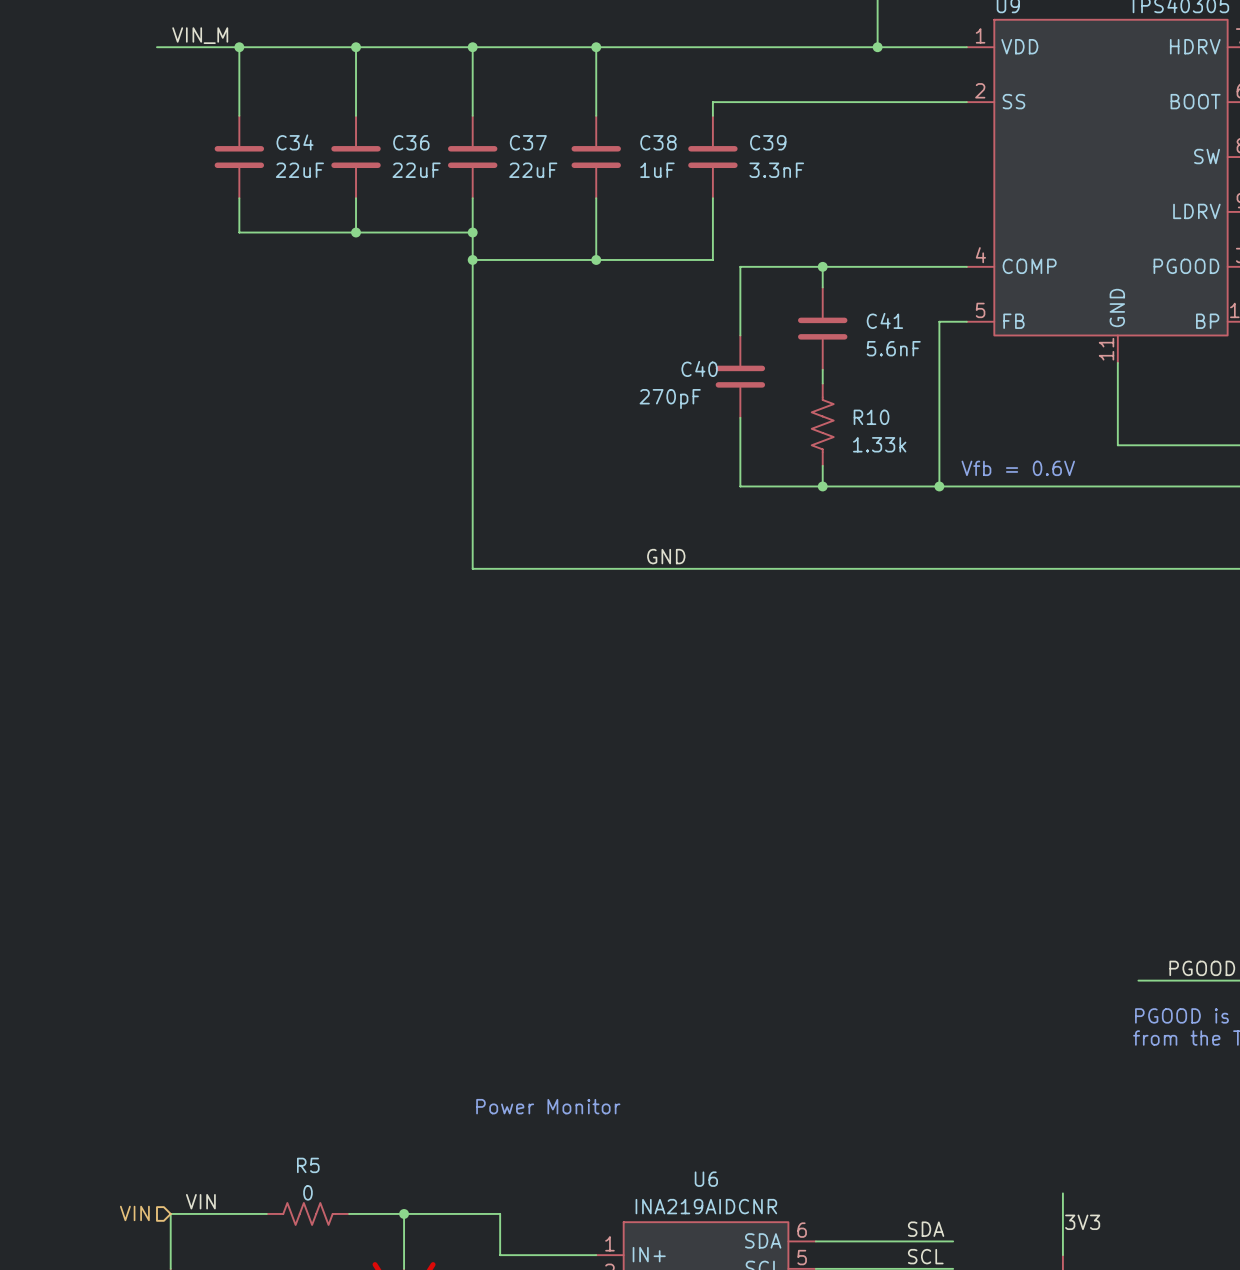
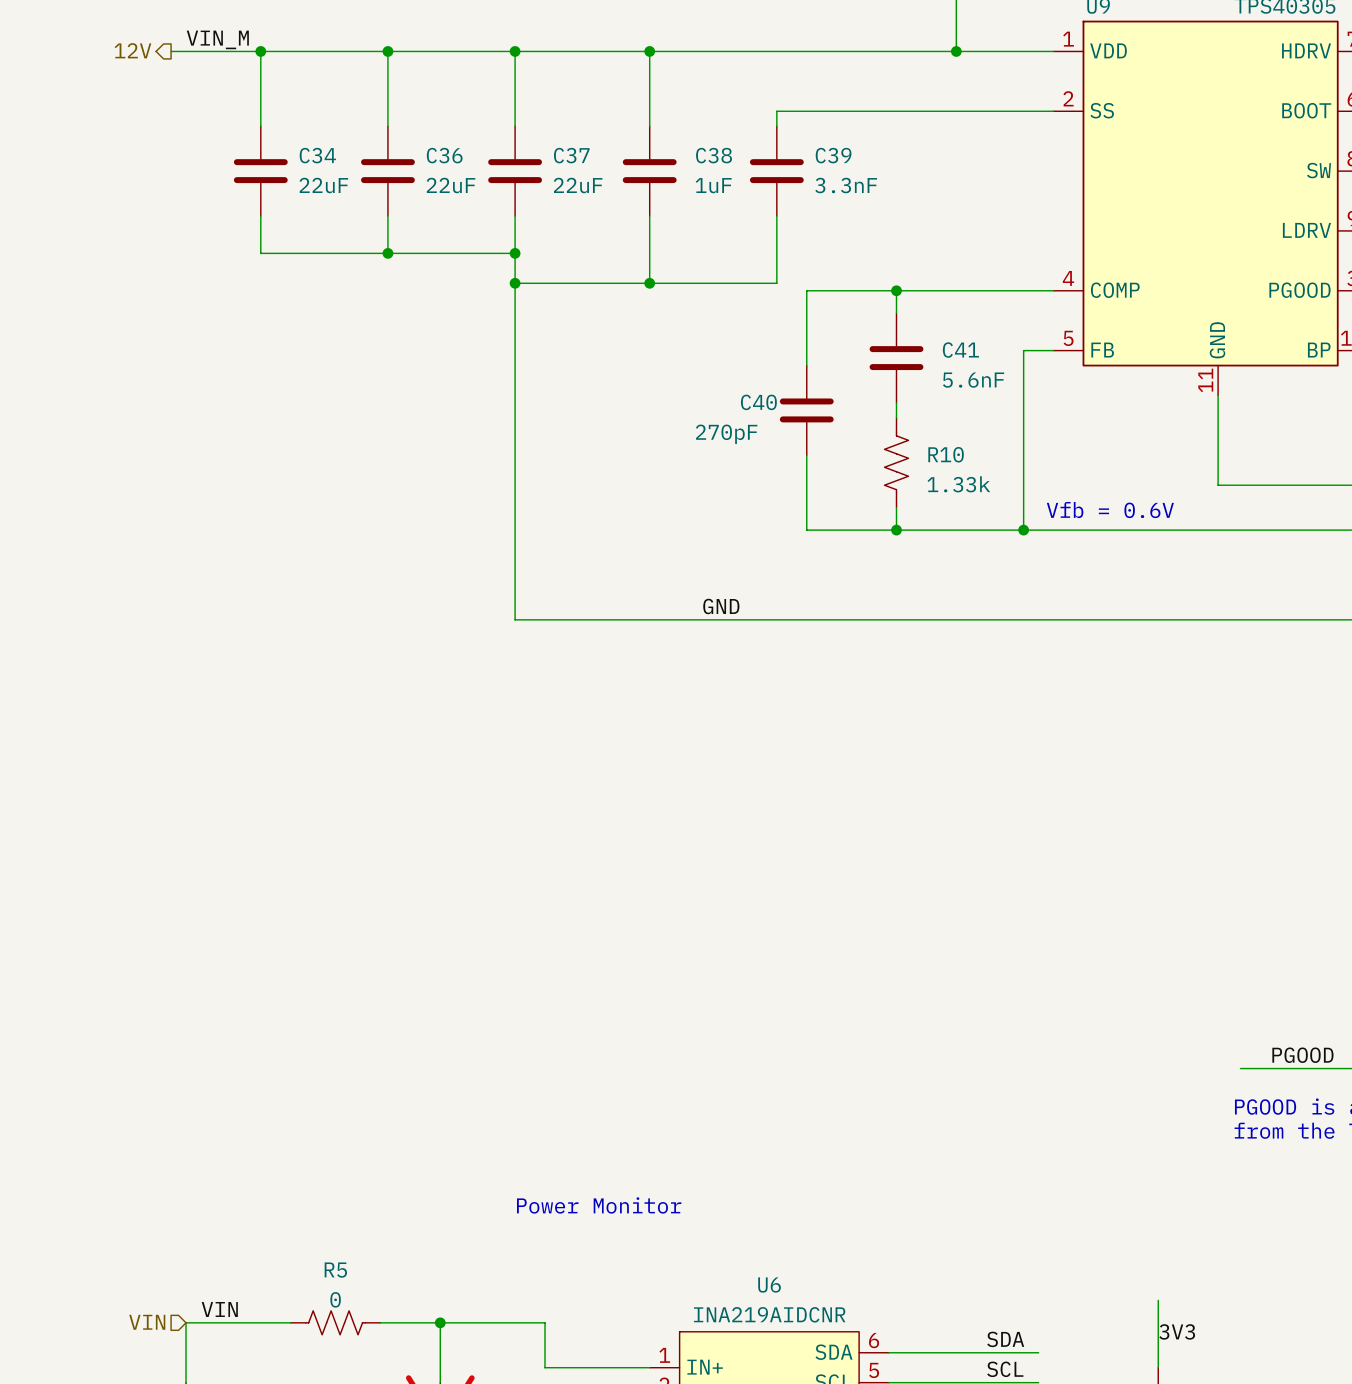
hierarchical label: none -> 12V (132, 50)

